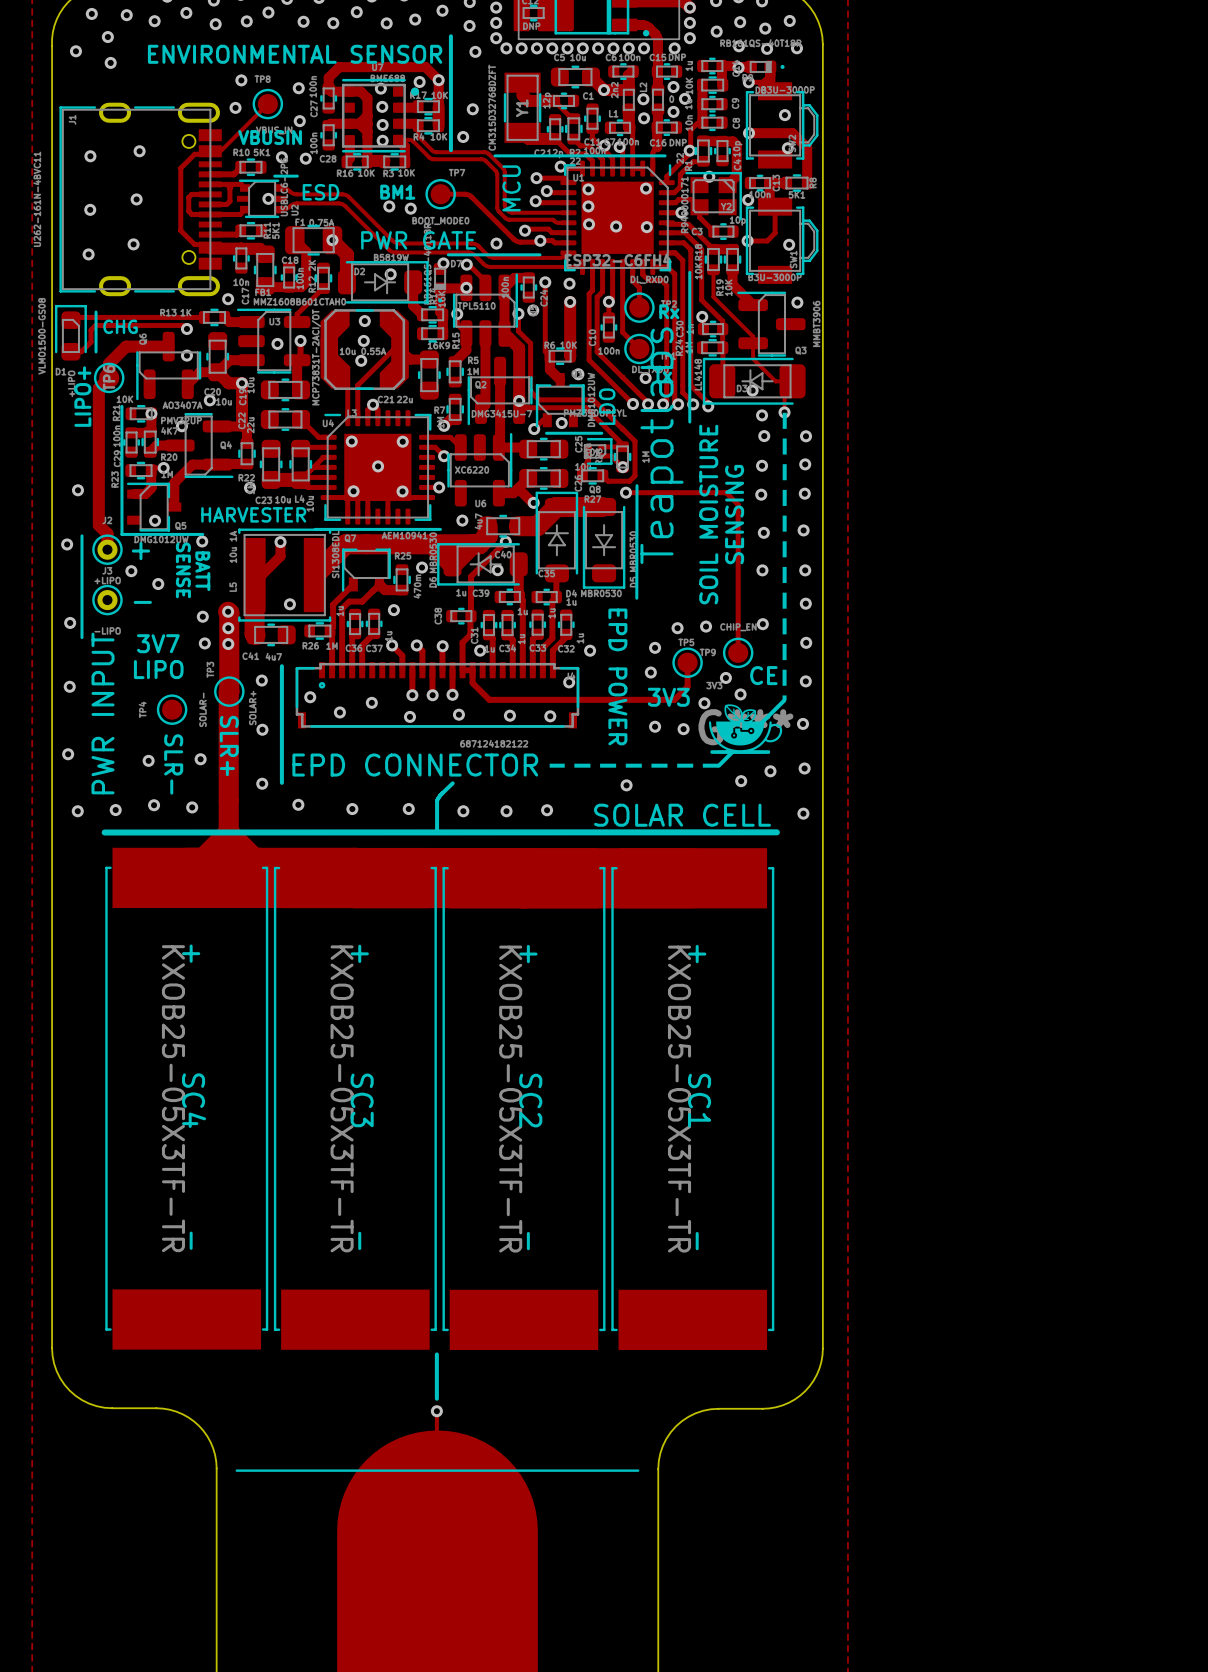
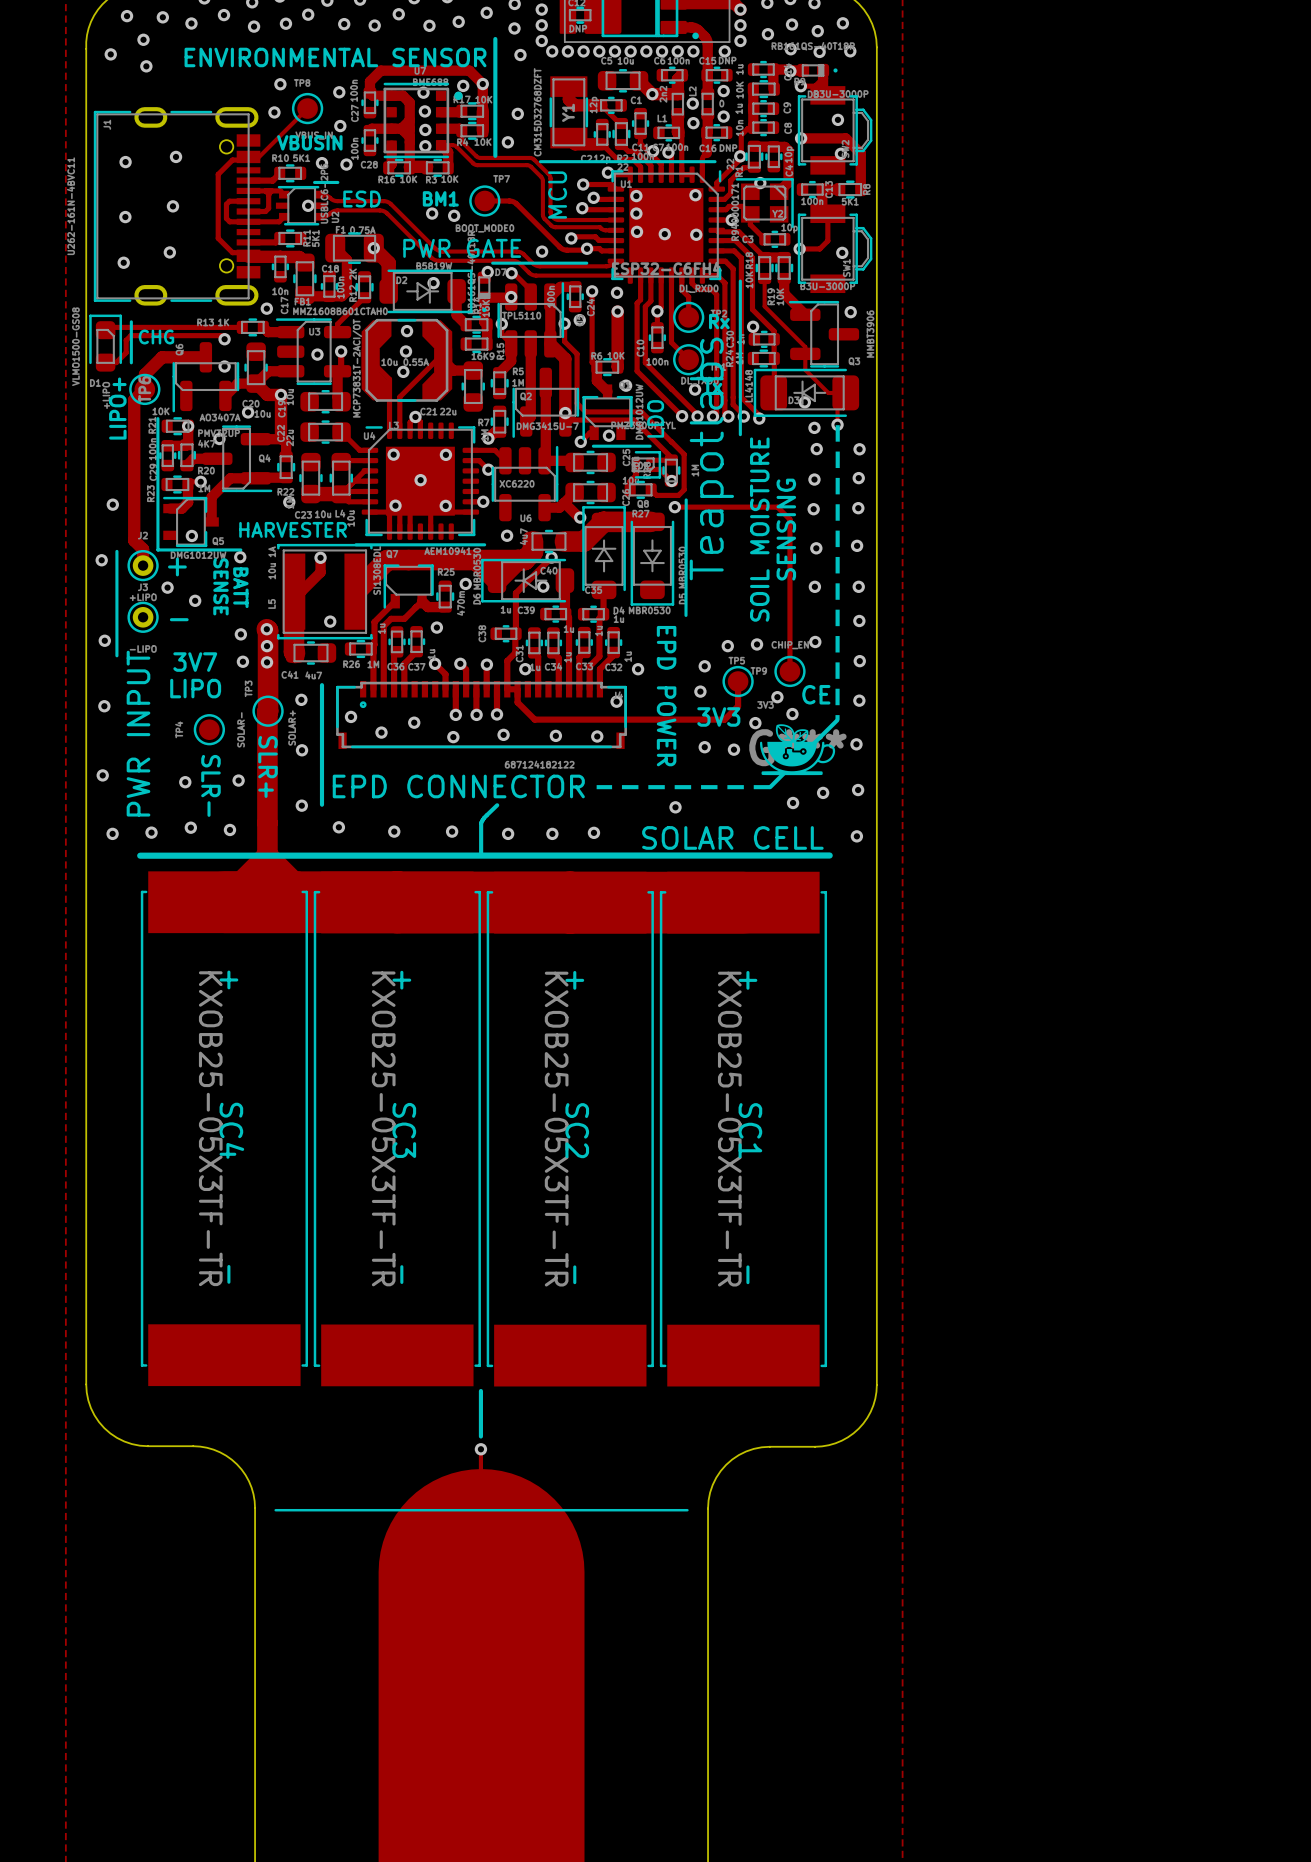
via: (684, 98) -> none
via: (748, 200) -> none

